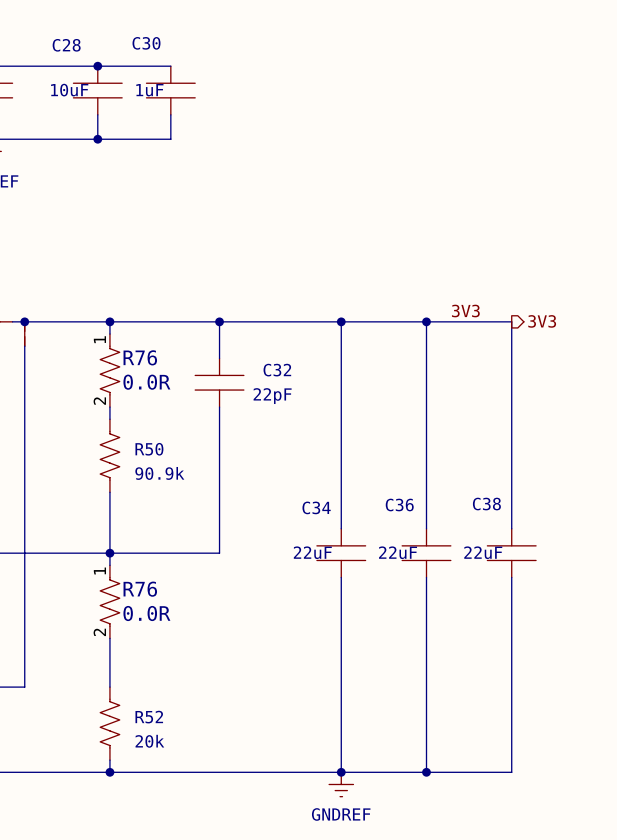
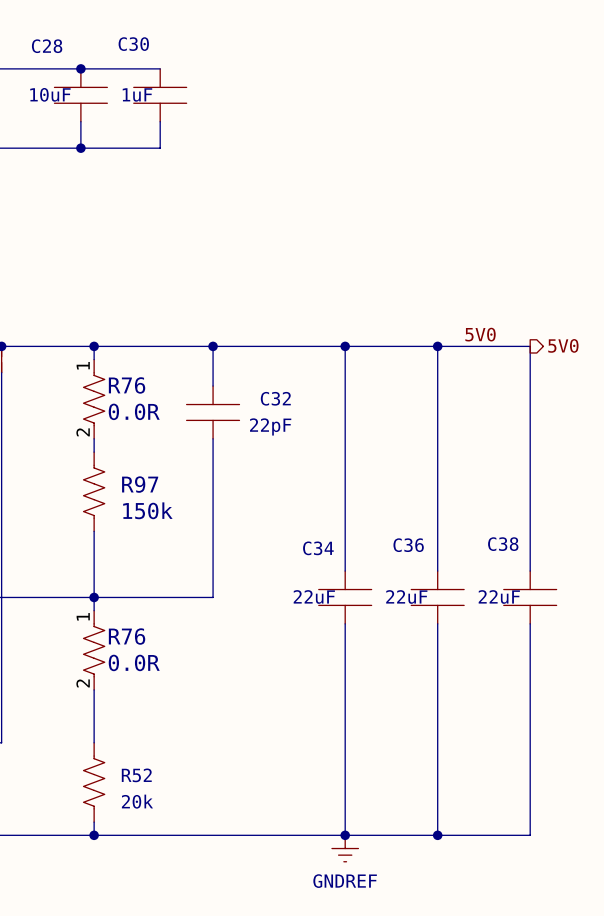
label: 3V3 (465, 311) -> 5V0 (480, 334)
hierarchical label: 3V3 (542, 321) -> 5V0 (563, 345)
R50 name: R50 (149, 449) -> R97 (140, 484)
R50 value: 90.9k (159, 473) -> 150k (147, 510)

